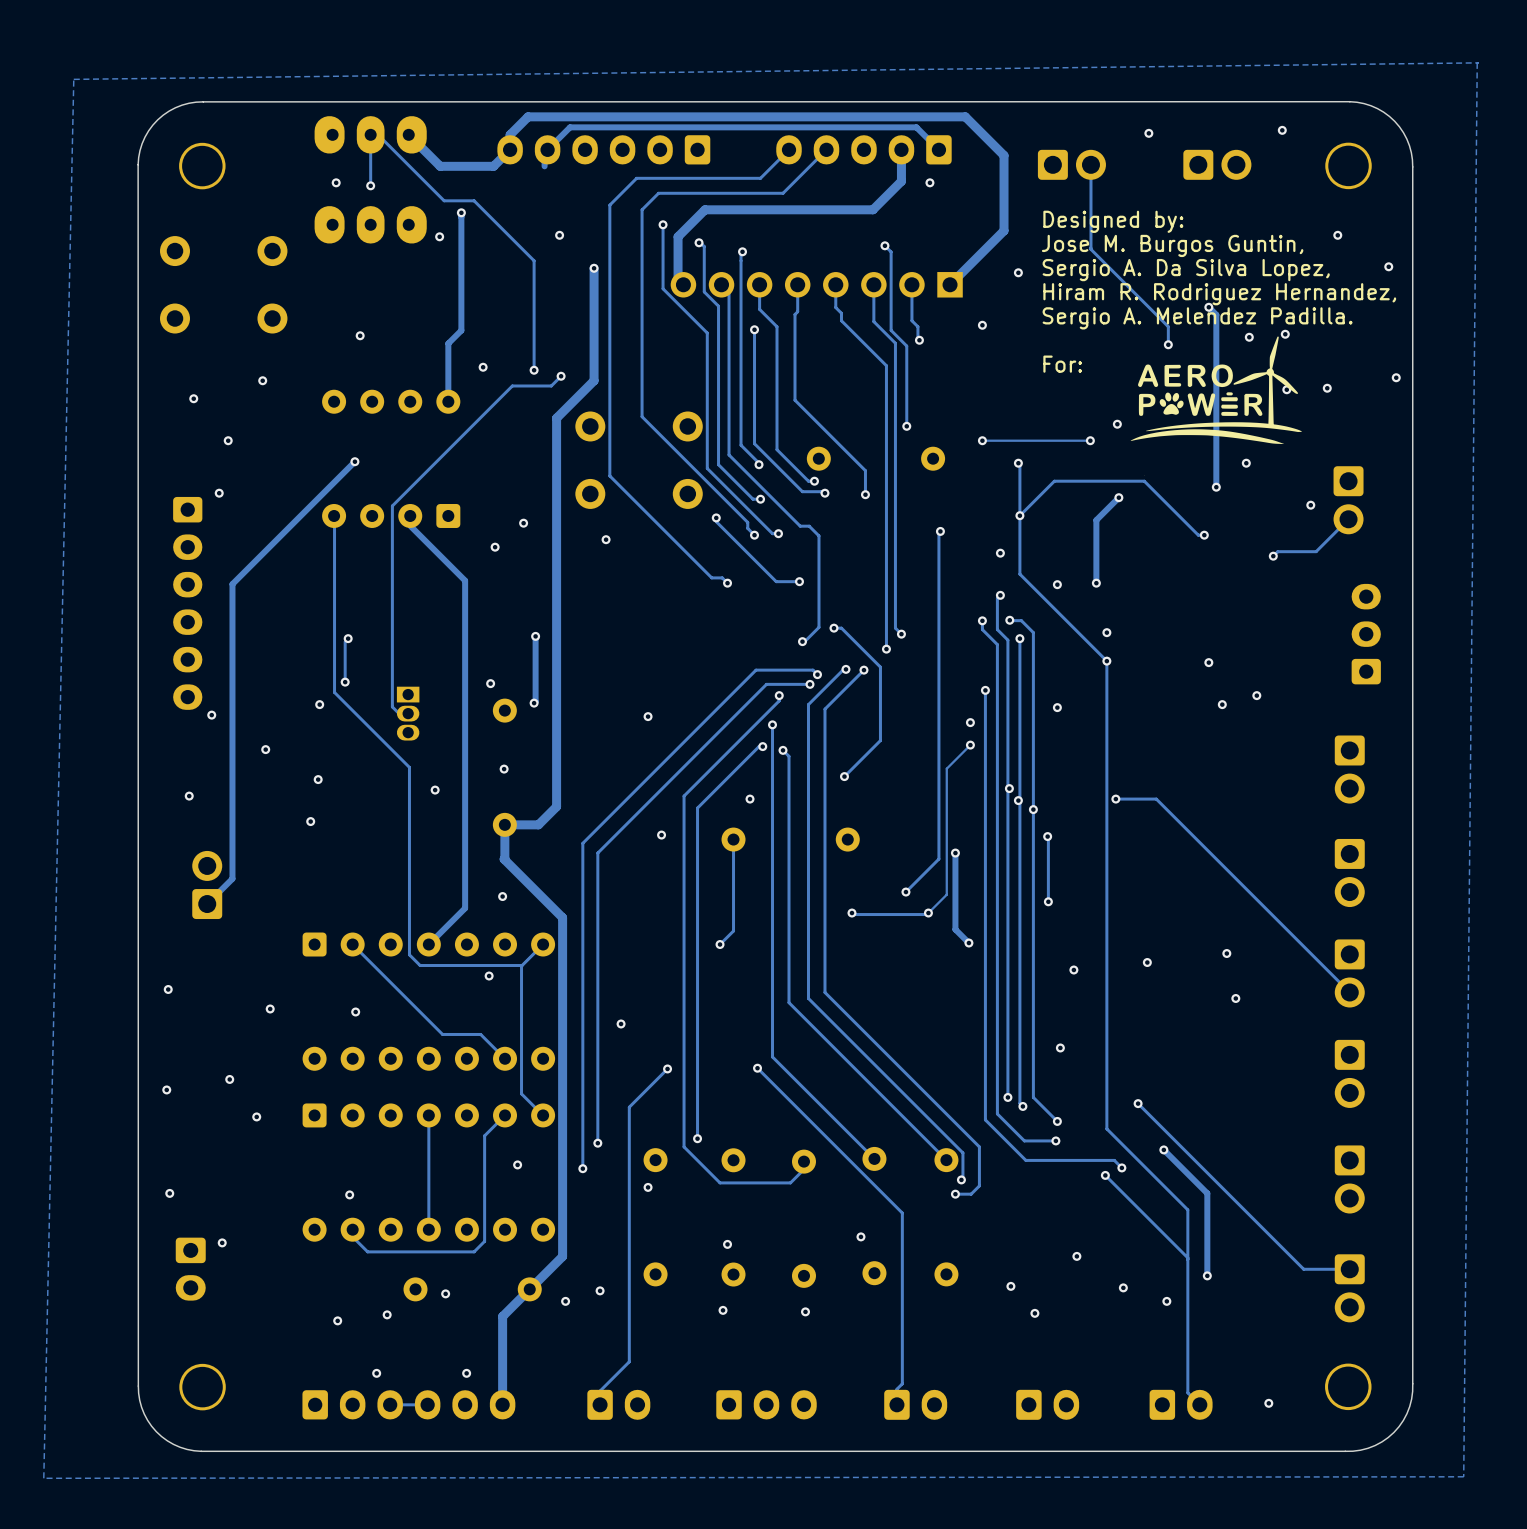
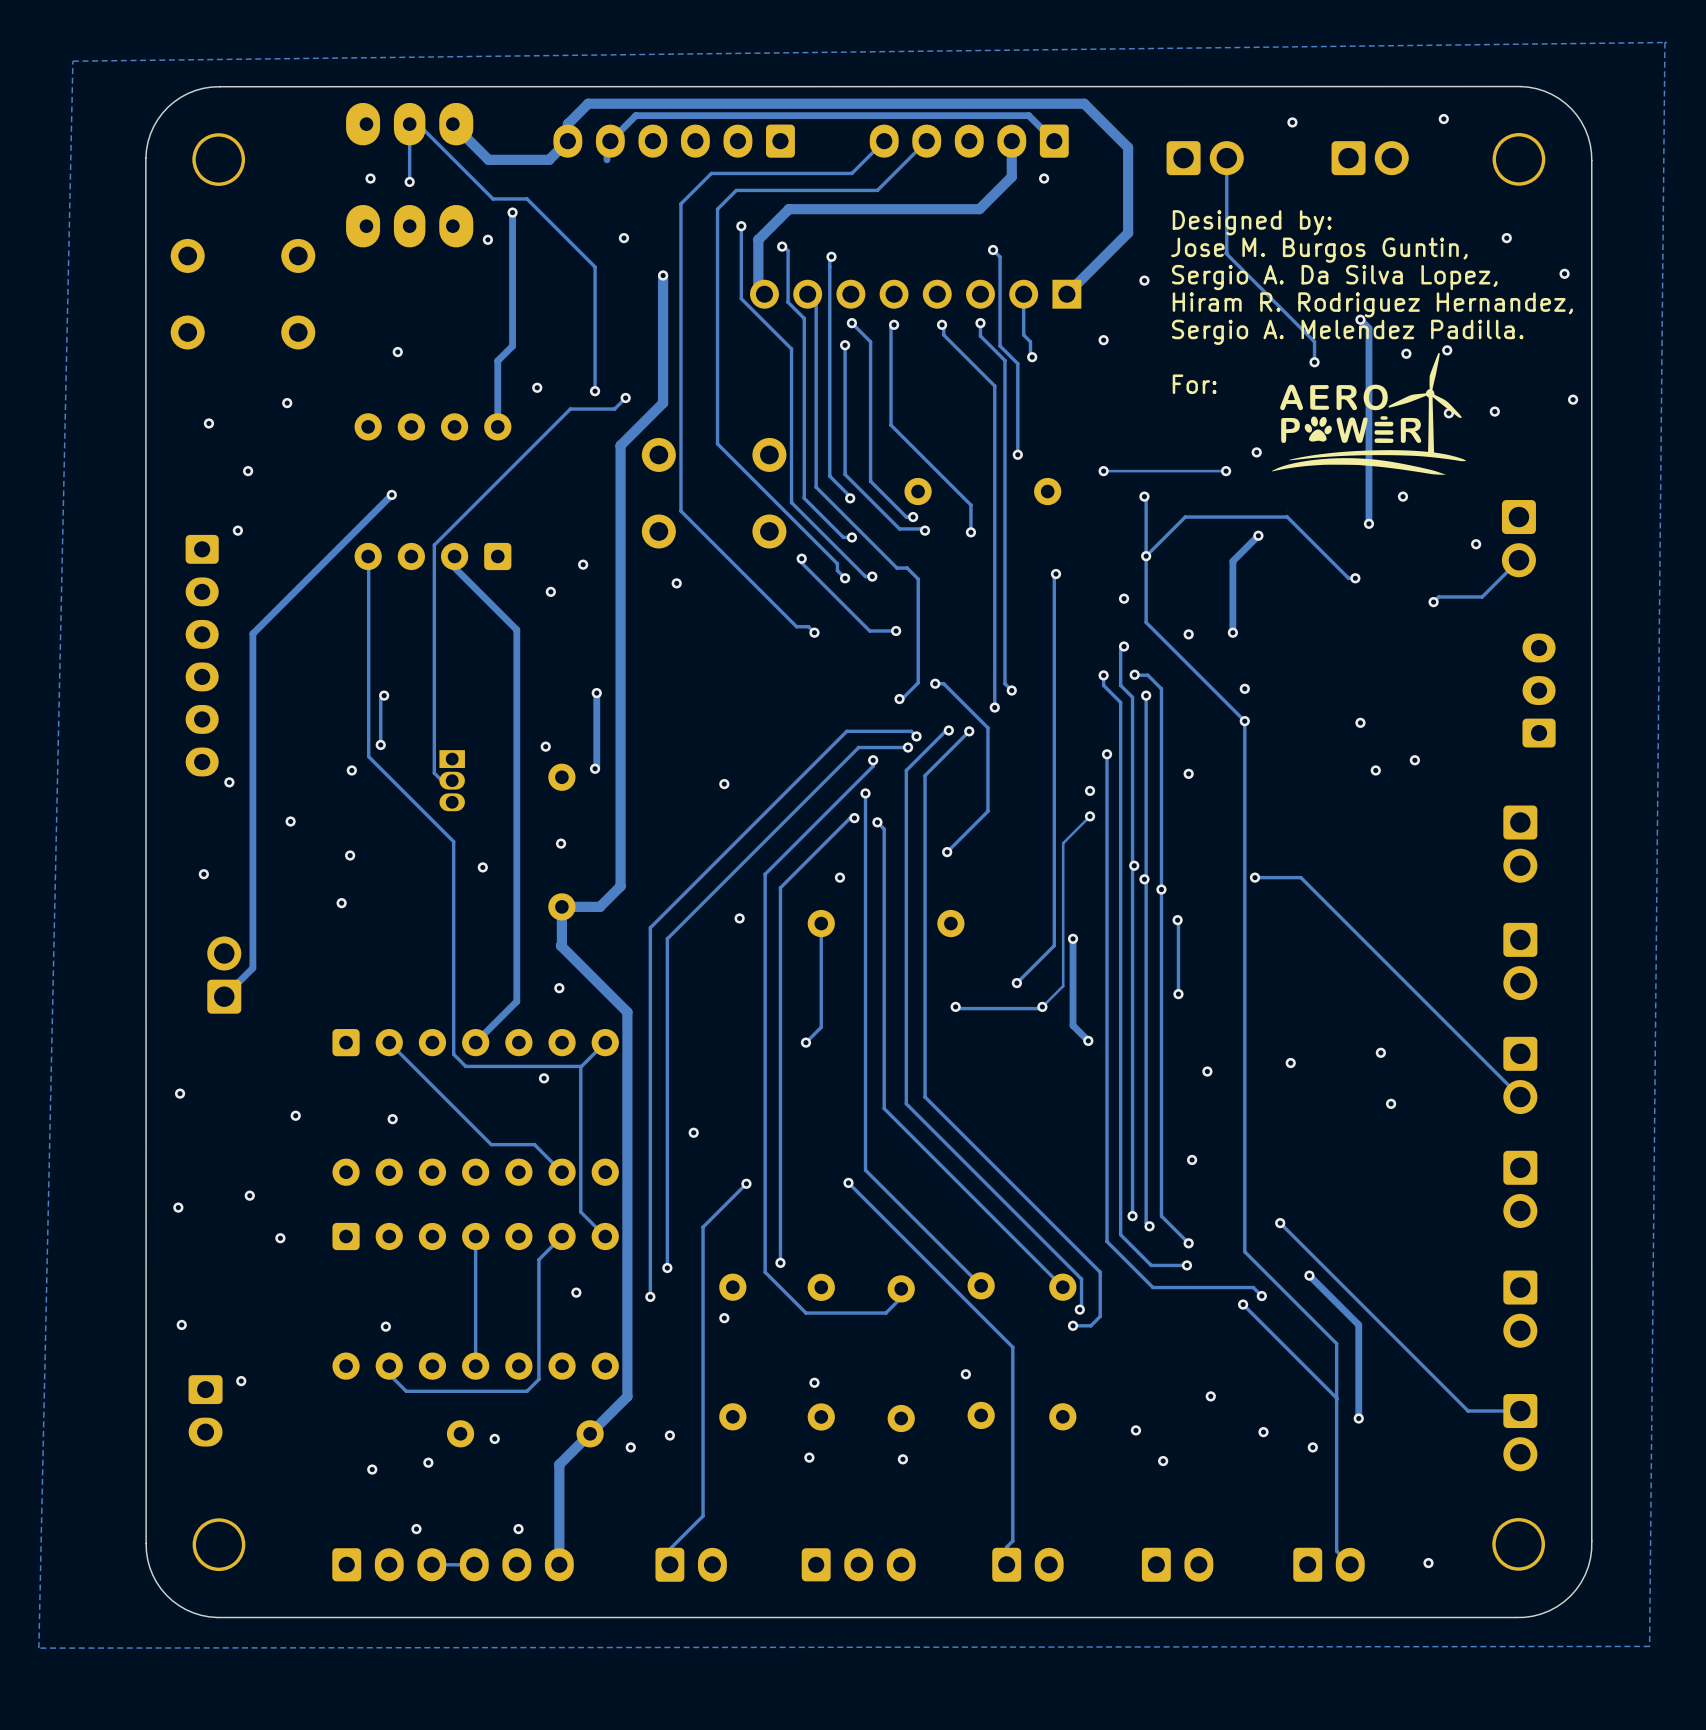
track: (759, 284) (760, 310) -> none
track: (797, 284) (797, 311) -> none
track: (835, 284) (835, 307) (839, 311) -> none
track: (873, 284) (873, 310) -> none
via: none -> (851, 323)
via: none -> (980, 323)
via: none -> (894, 324)
via: none -> (942, 324)

